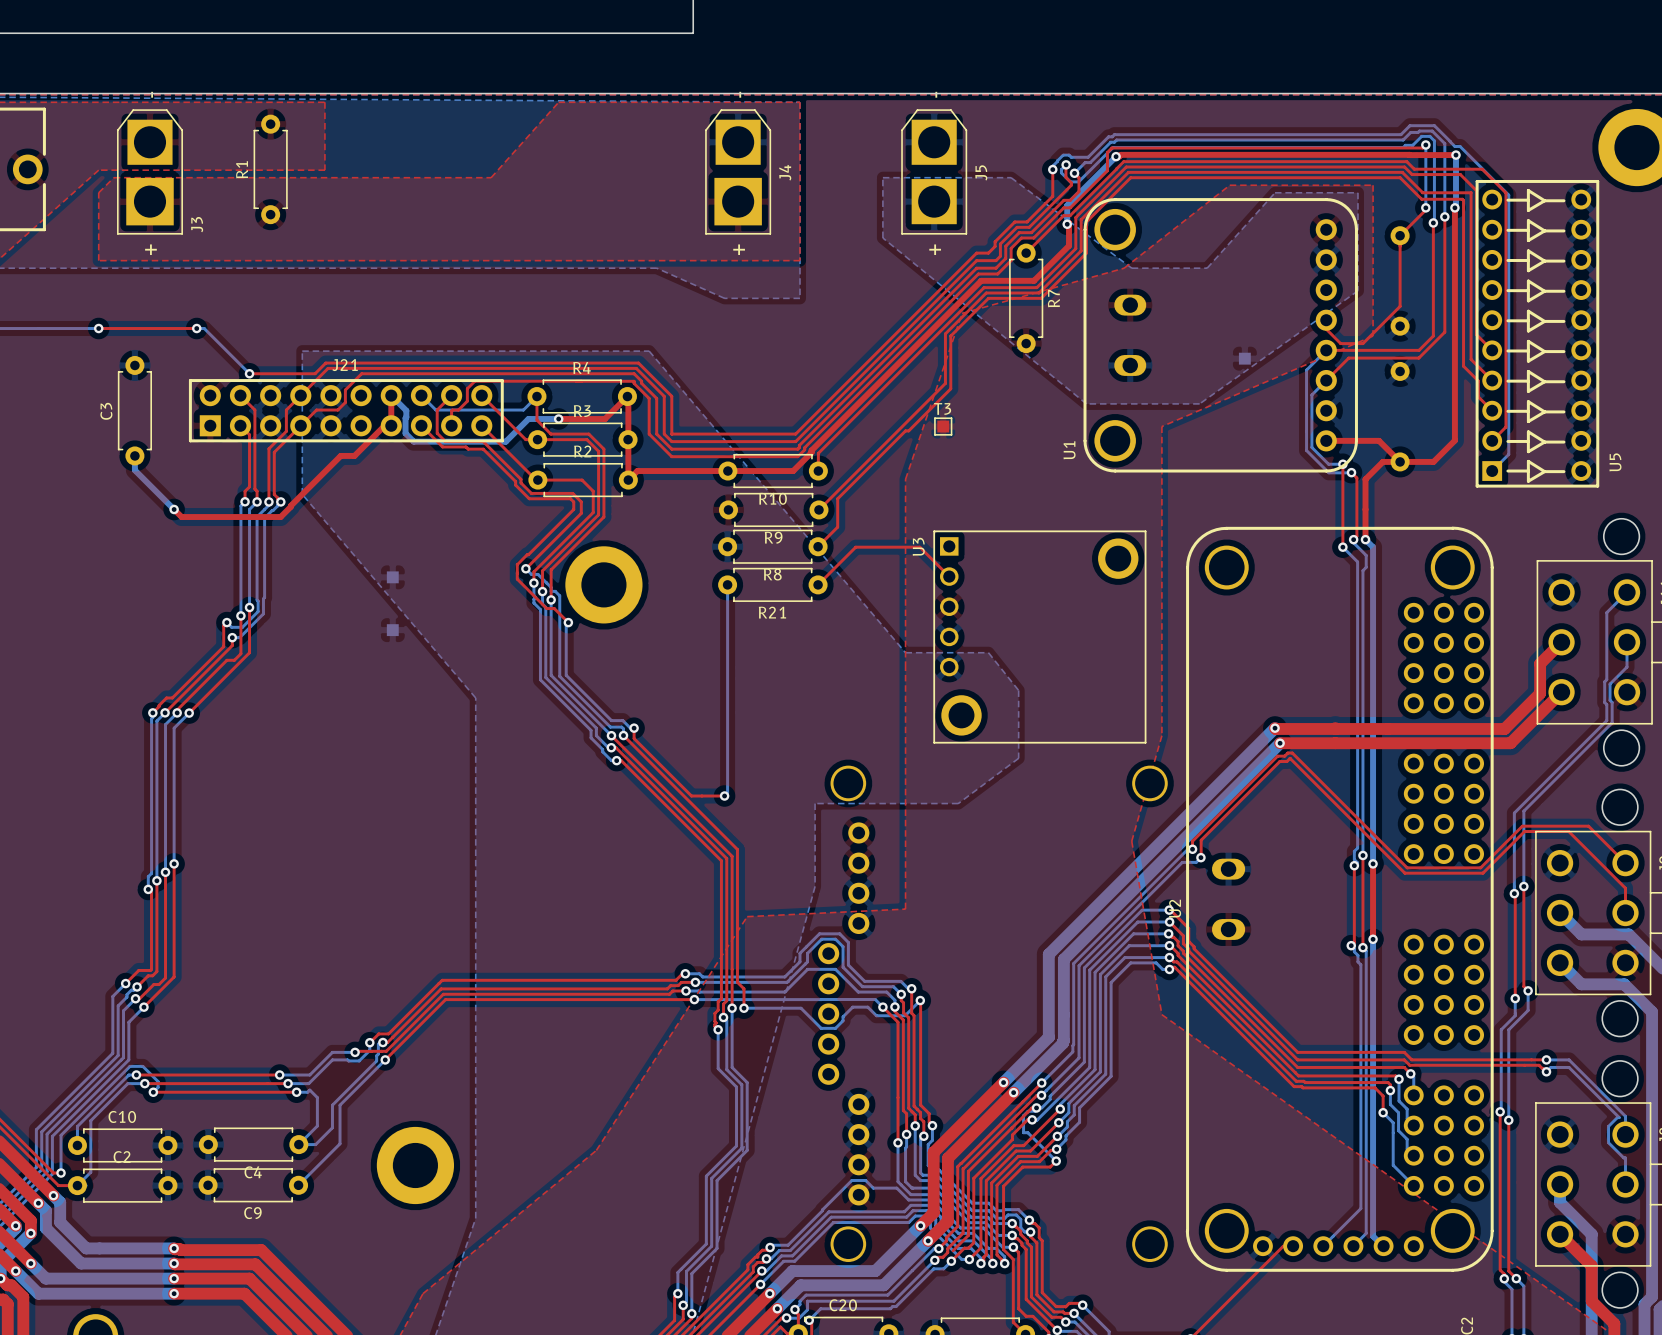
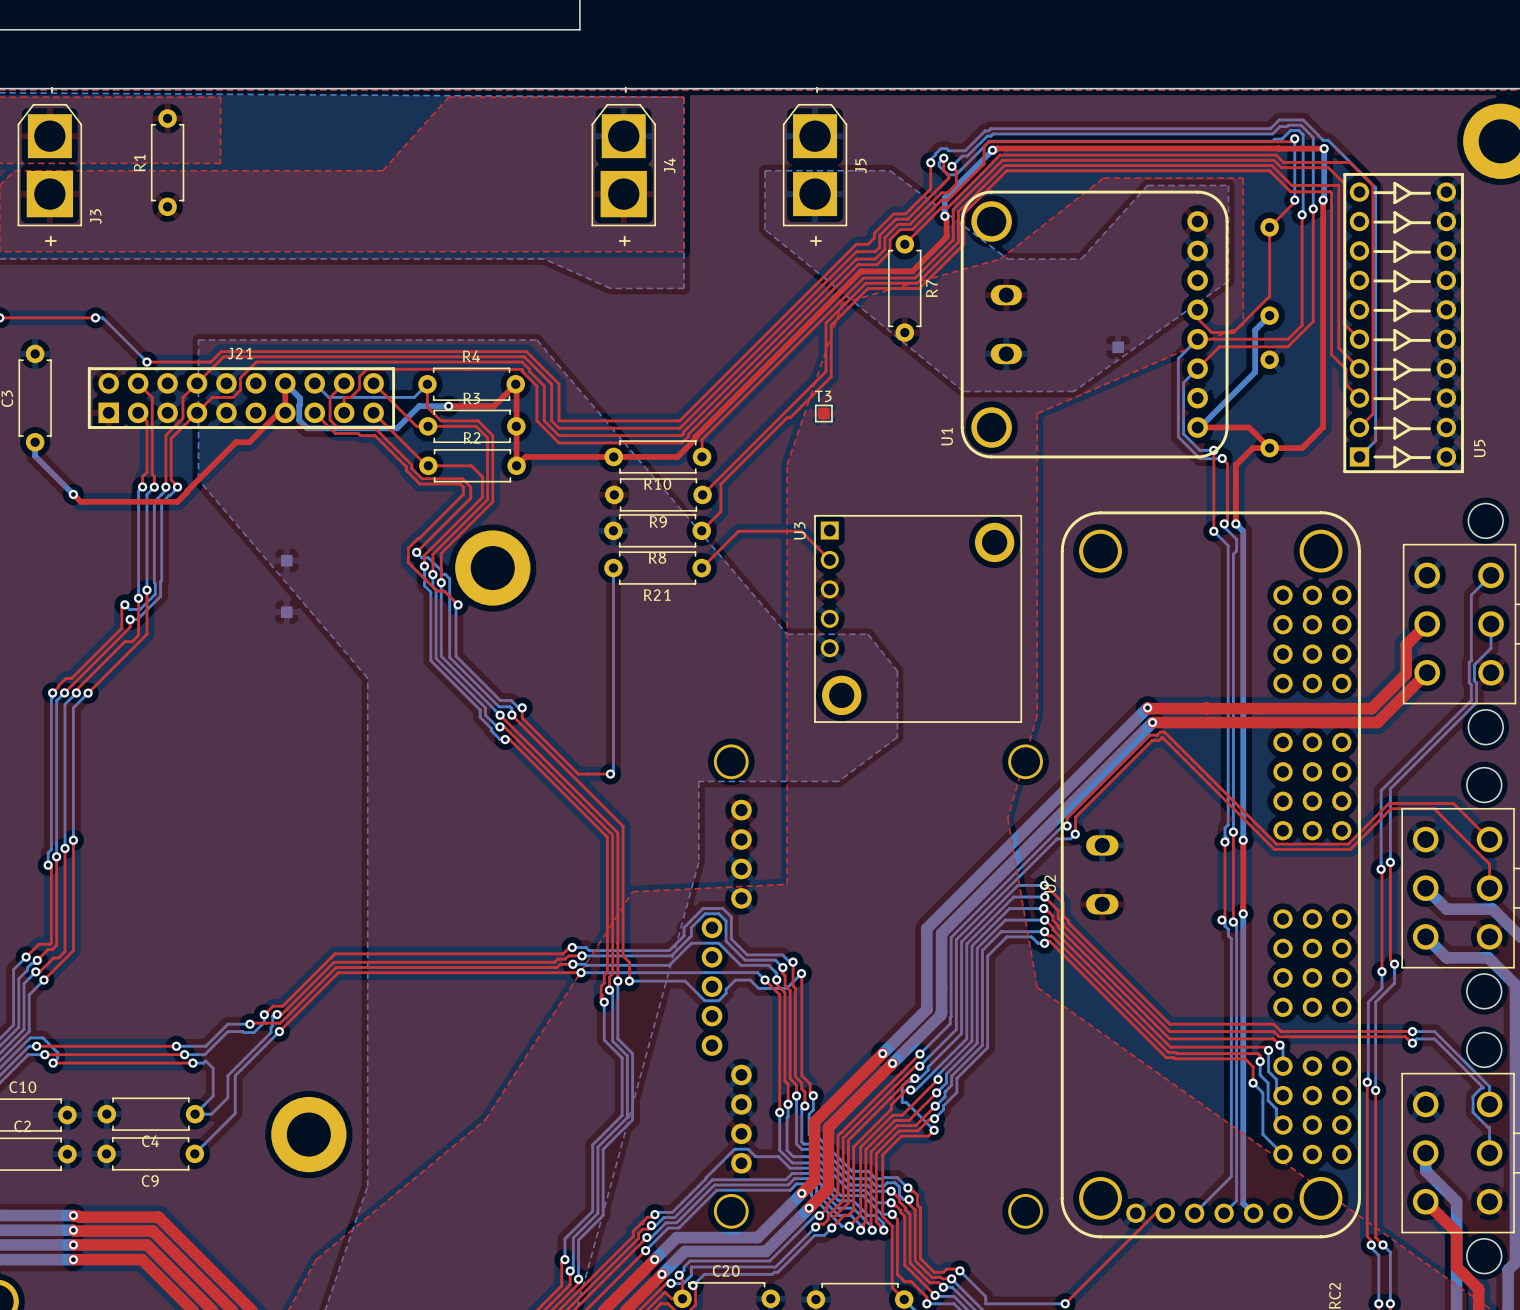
bottom track: none -> (1269, 315) (1255, 330) (1255, 372) (1199, 428)

